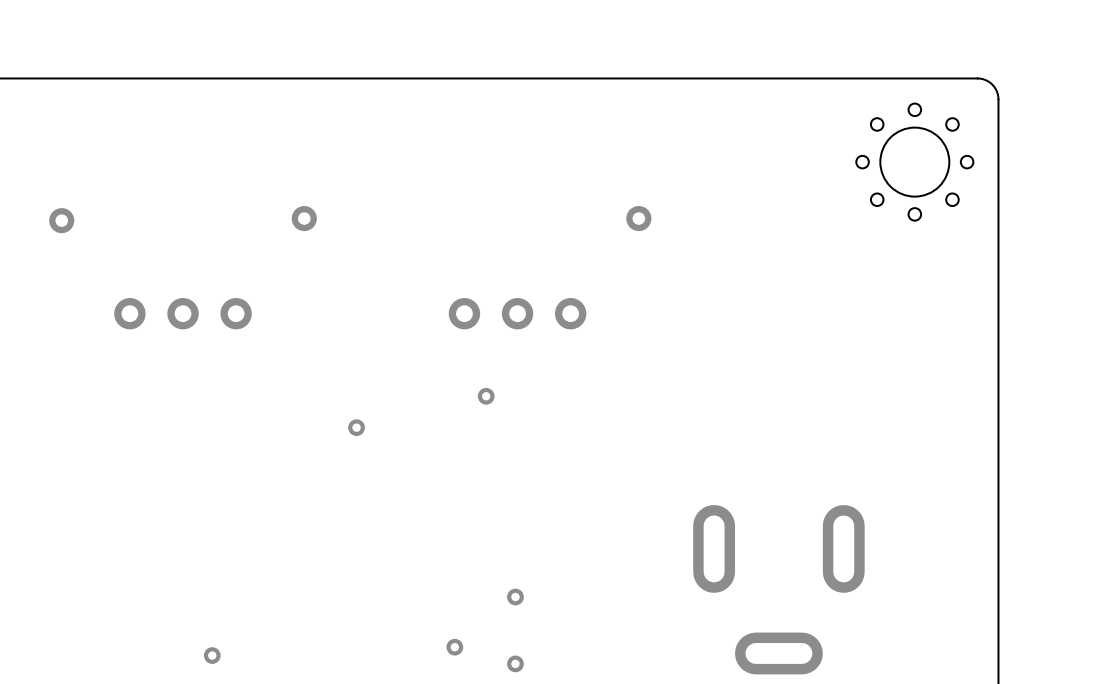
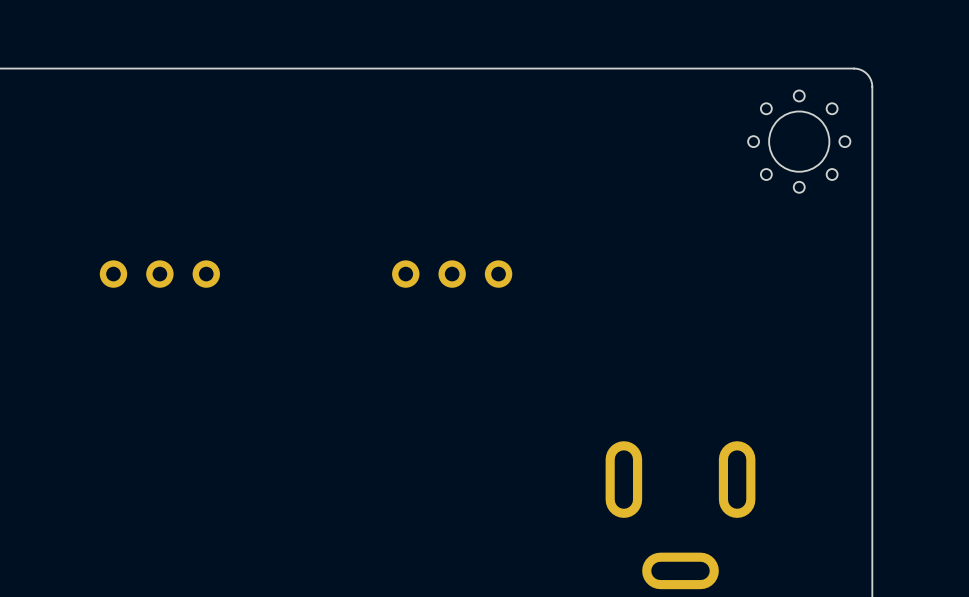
via: (304, 218) -> none
via: (638, 218) -> none
via: (61, 220) -> none
via: (486, 396) -> none
via: (356, 427) -> none
via: (515, 597) -> none
via: (454, 647) -> none
via: (212, 655) -> none
via: (515, 663) -> none

